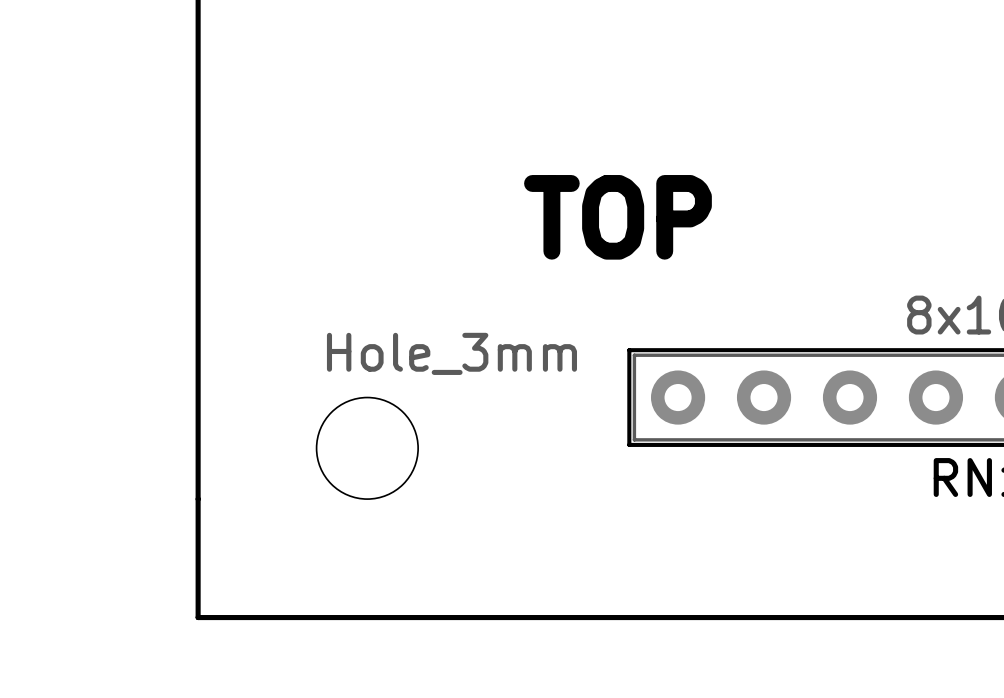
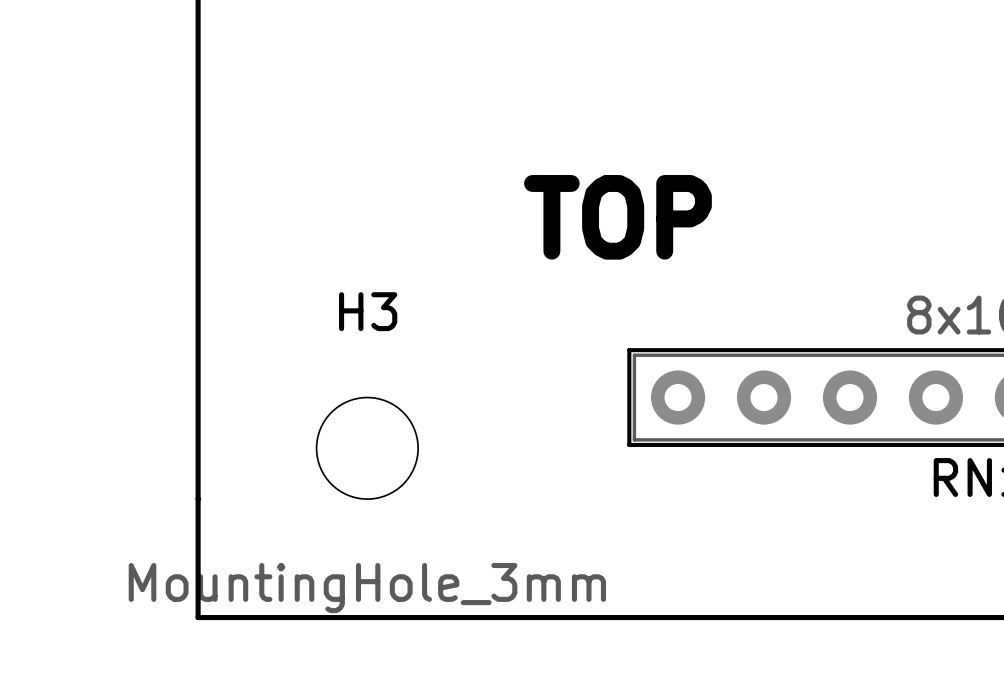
H3 name: none -> H3 (368, 311)
H3 value: Hole_3mm (451, 353) -> MountingHole_3mm (367, 588)

